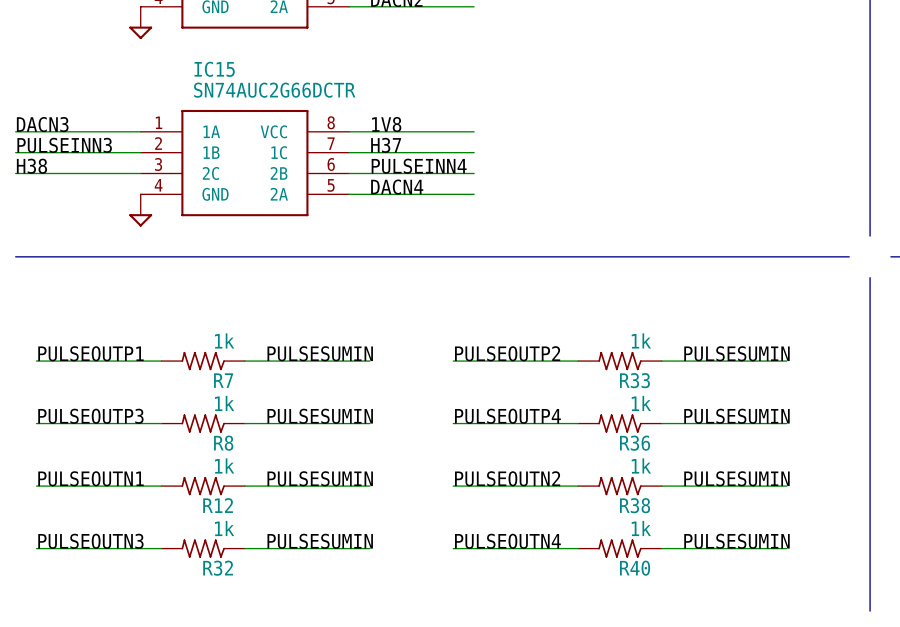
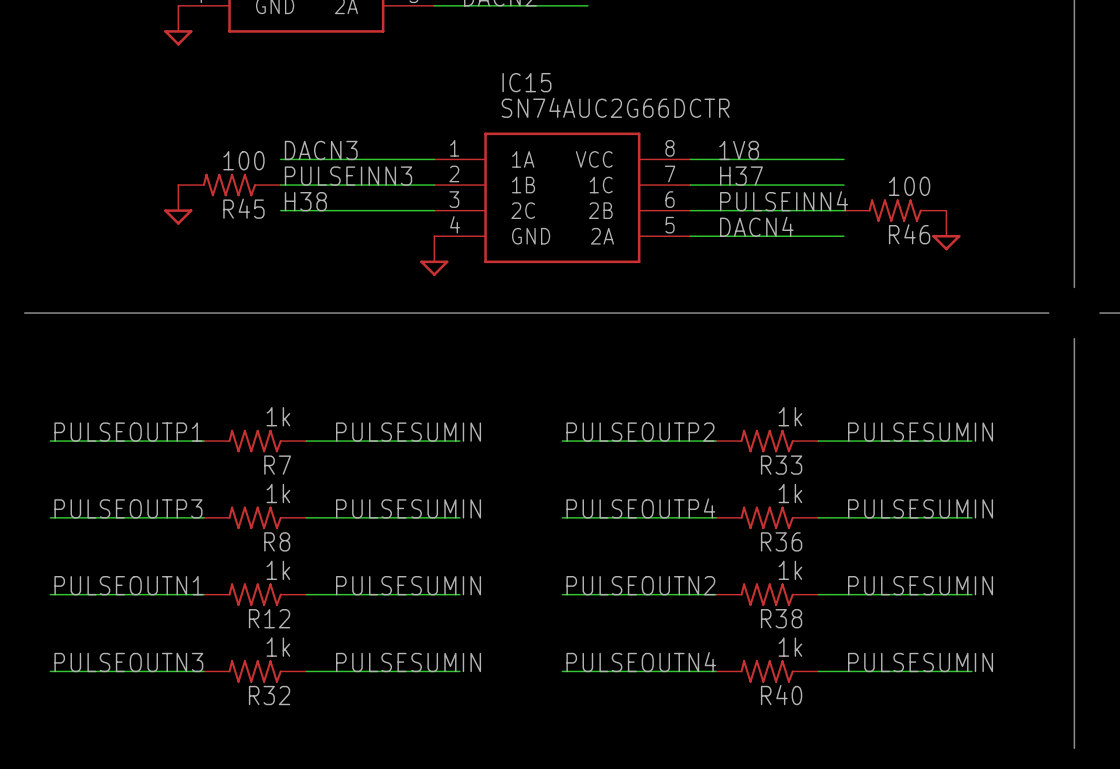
label: DACN3 (42, 124) -> none
label: none -> DACN3 (321, 150)
label: 1V8 (386, 124) -> none
label: none -> 1V8 (739, 150)
wire: (15, 131) (140, 131) -> none
wire: (349, 131) (474, 131) -> (434, 159) (280, 159)
wire: none -> (690, 159) (843, 159)
label: PULSEINN3 (64, 145) -> none
label: none -> PULSEINN3 (348, 176)
label: H37 (386, 145) -> none
label: none -> H37 (741, 176)
wire: (15, 152) (140, 152) -> none
R45: none -> 100 (229, 185)
wire: (349, 152) (474, 152) -> (434, 185) (280, 185)
wire: none -> (690, 185) (843, 185)
IC15 position: (244, 163) -> (562, 197)
label: H38 (31, 166) -> none
label: none -> H38 (305, 201)
label: PULSEINN4 (419, 166) -> none
label: none -> PULSEINN4 (784, 201)
wire: (15, 173) (140, 173) -> none
wire: (349, 173) (474, 173) -> (434, 210) (280, 210)
wire: none -> (690, 210) (843, 210)
R46: none -> 100 (895, 210)
label: DACN4 (397, 187) -> none
label: none -> DACN4 (756, 226)
power symbol: none -> (946, 230)
wire: (349, 194) (474, 194) -> none
wire: none -> (690, 236) (843, 236)
power symbol position: (140, 210) -> (178, 204)
power symbol: none -> (434, 256)

